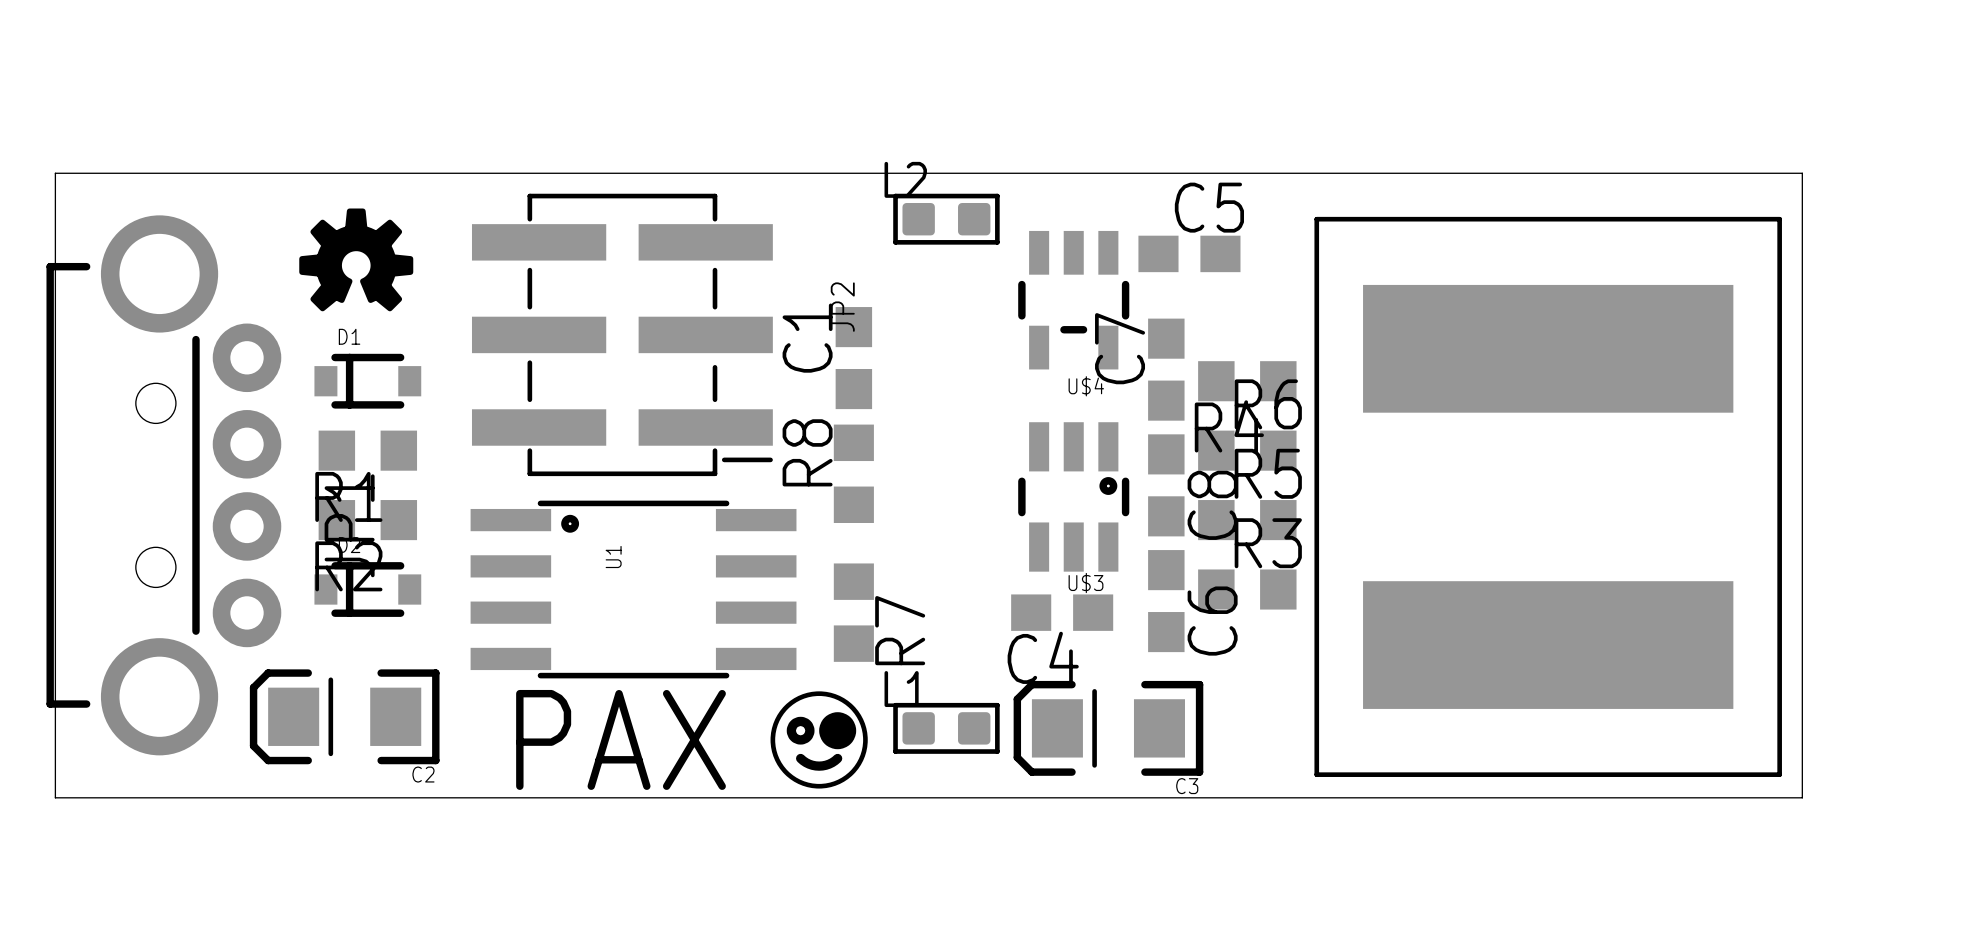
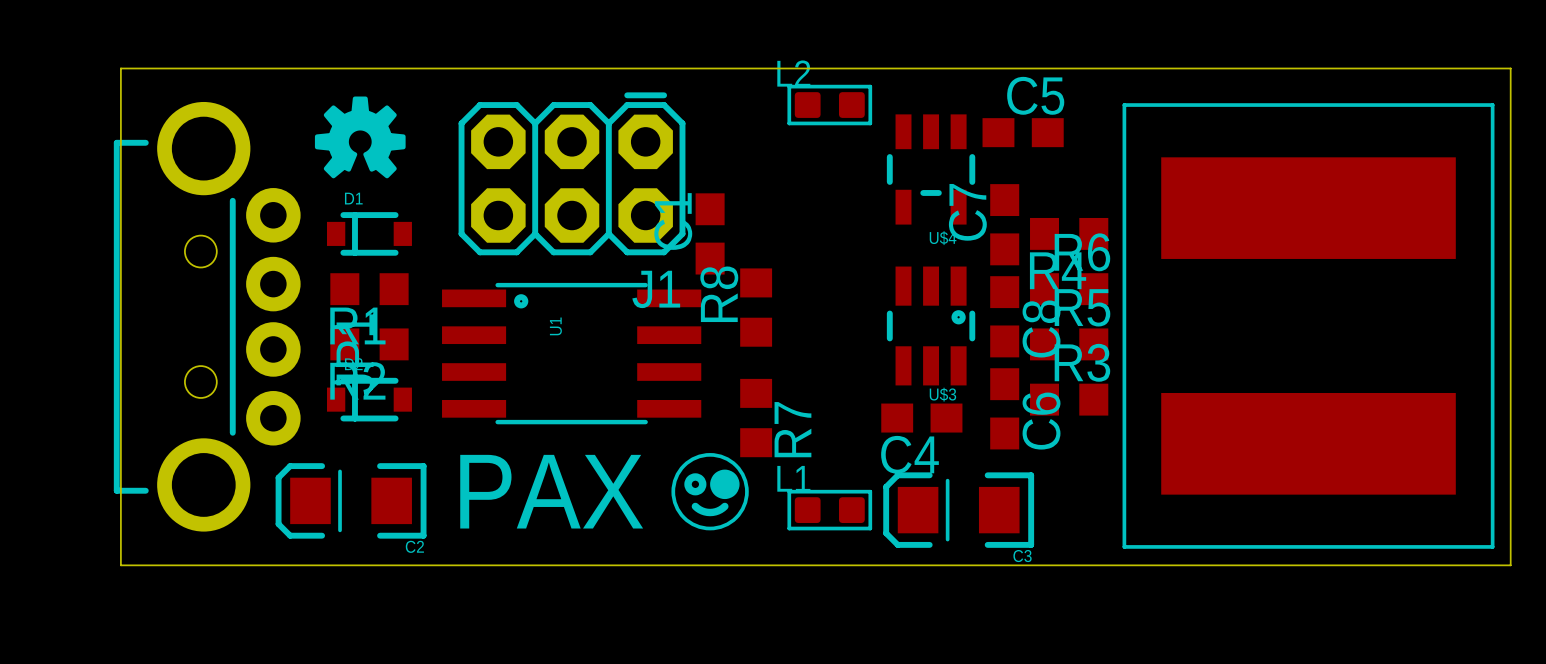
J1: none -> (572, 173)
JP2: (622, 334) -> none
C1 position: (853, 358) -> (710, 233)
U1 position: (633, 589) -> (571, 353)
drawing position: (819, 739) -> (710, 491)

